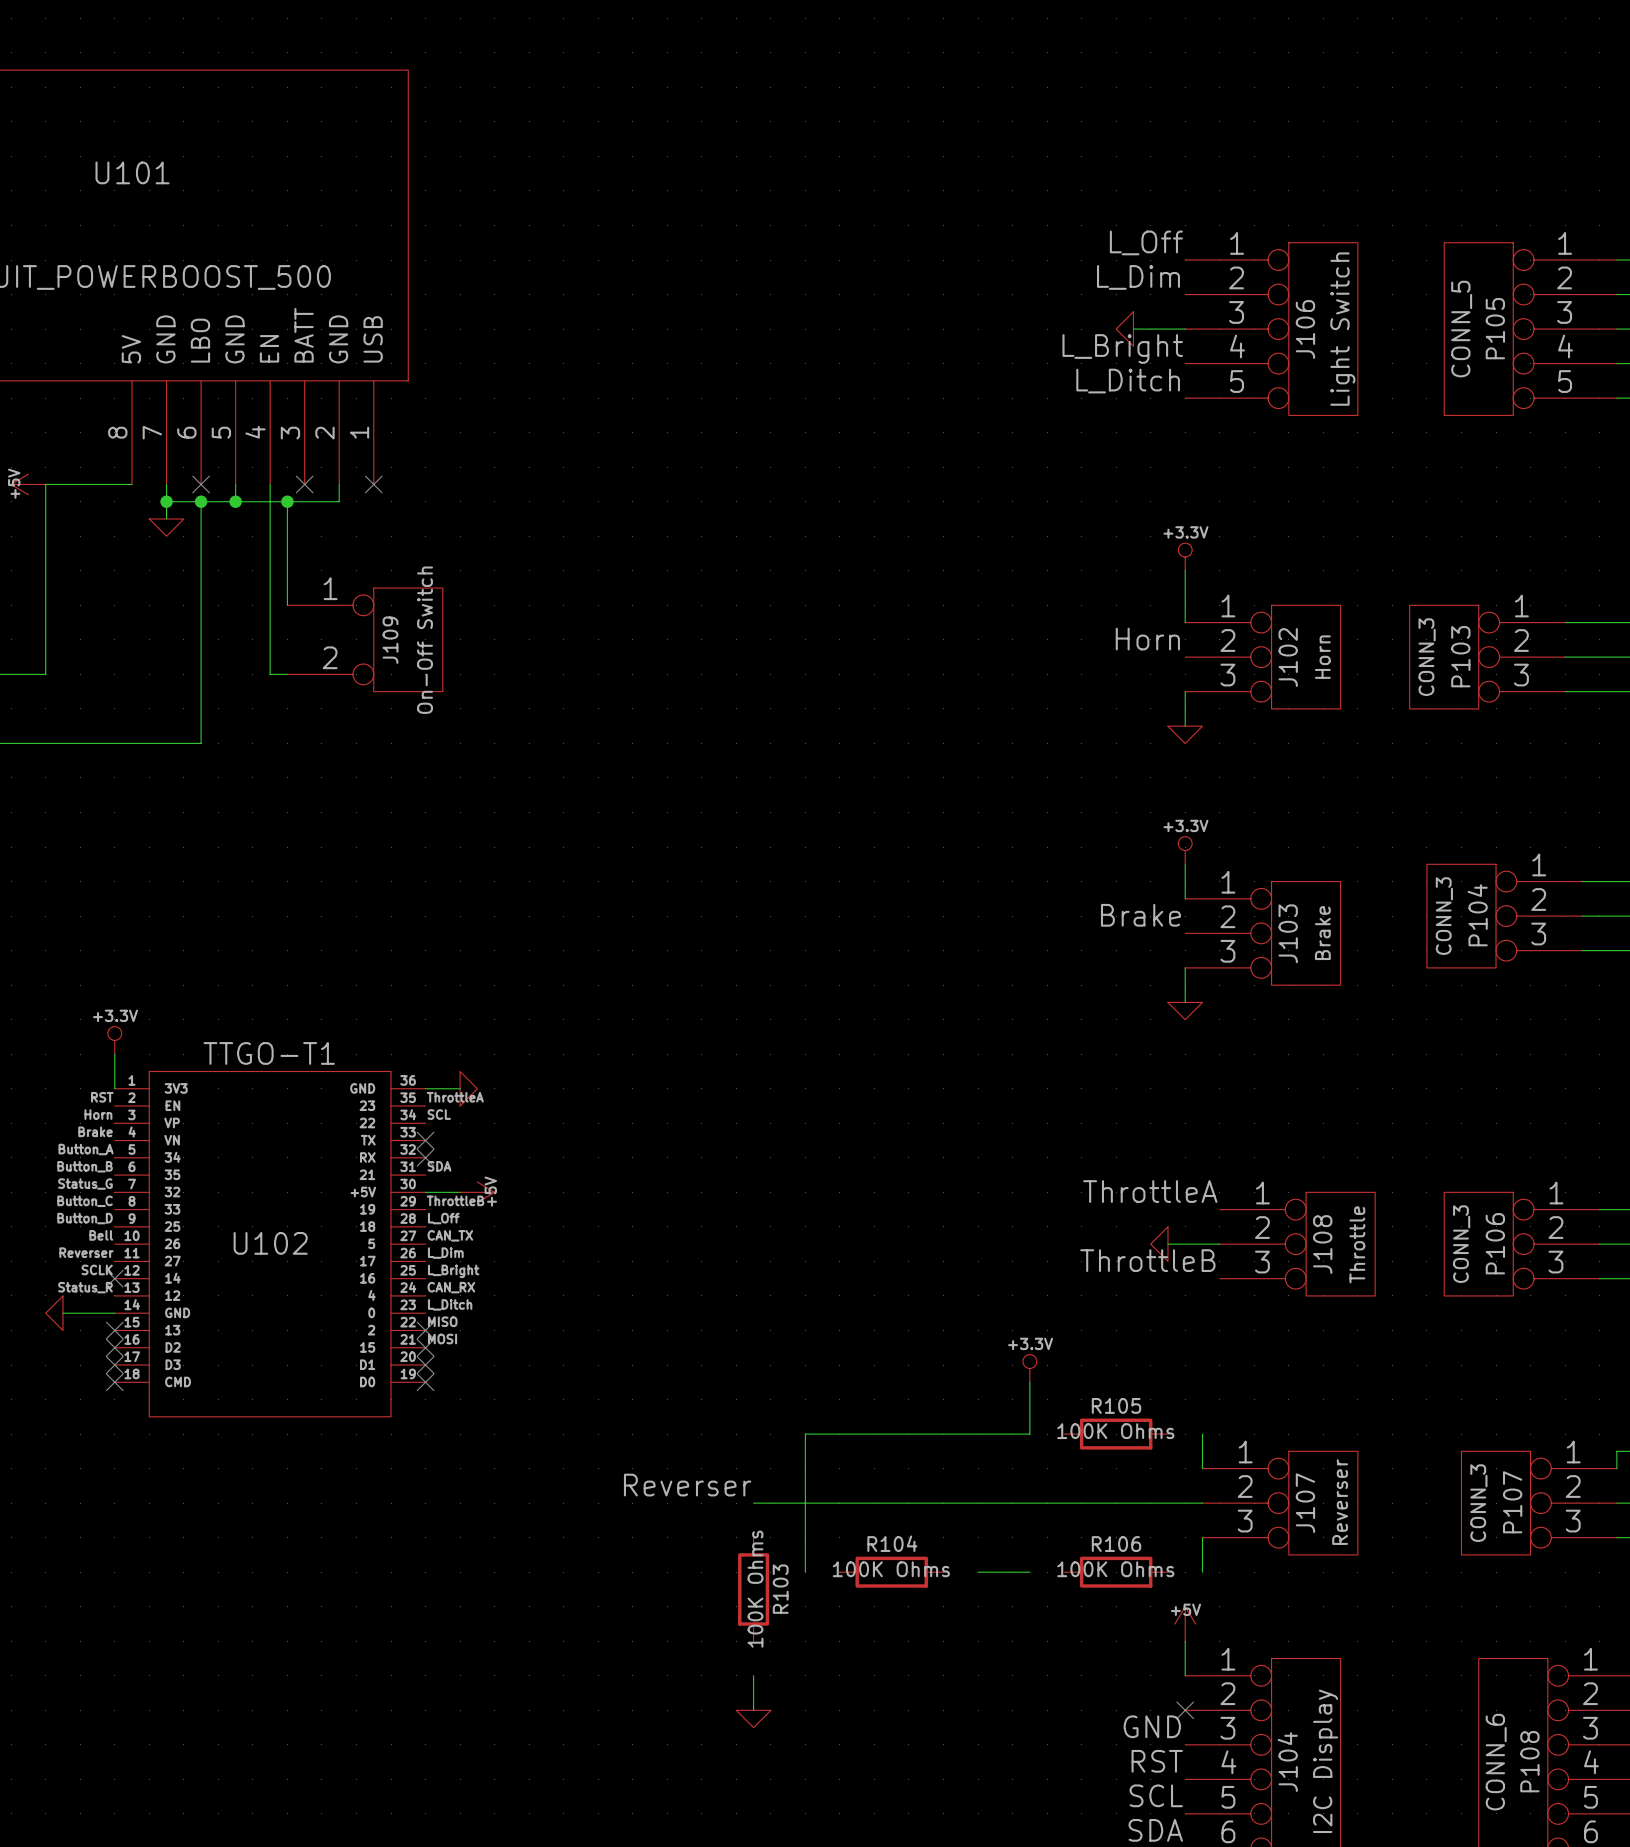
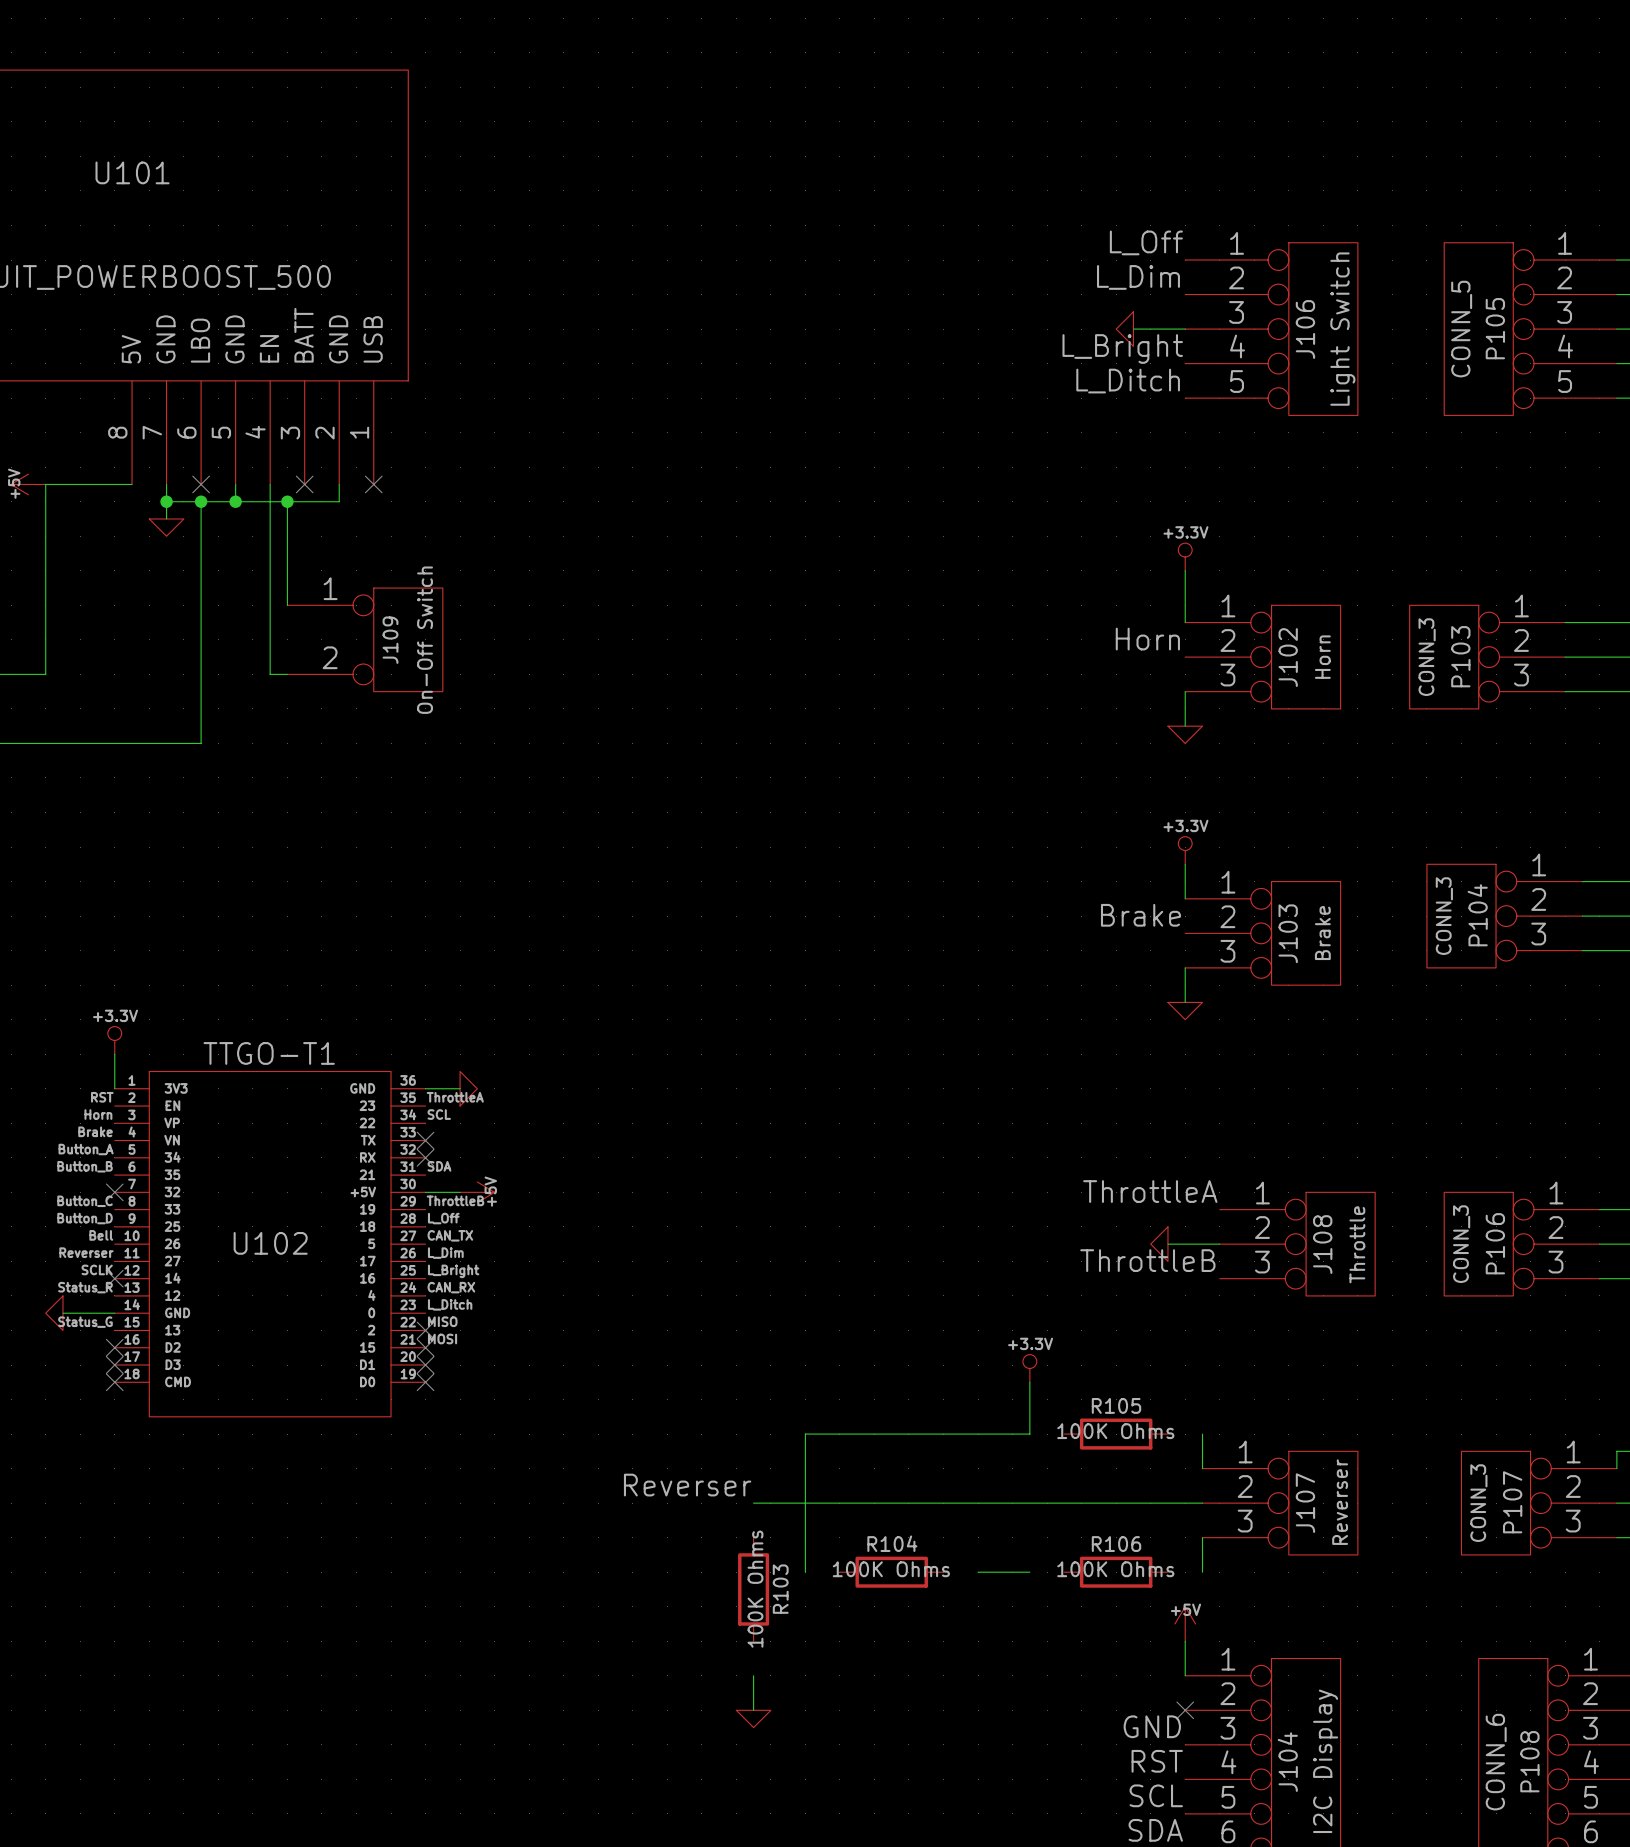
label position: Status_G (85, 1184) -> Status_G (85, 1322)
no-connect mark: none -> (114, 1192)
no-connect mark: (114, 1330) -> none

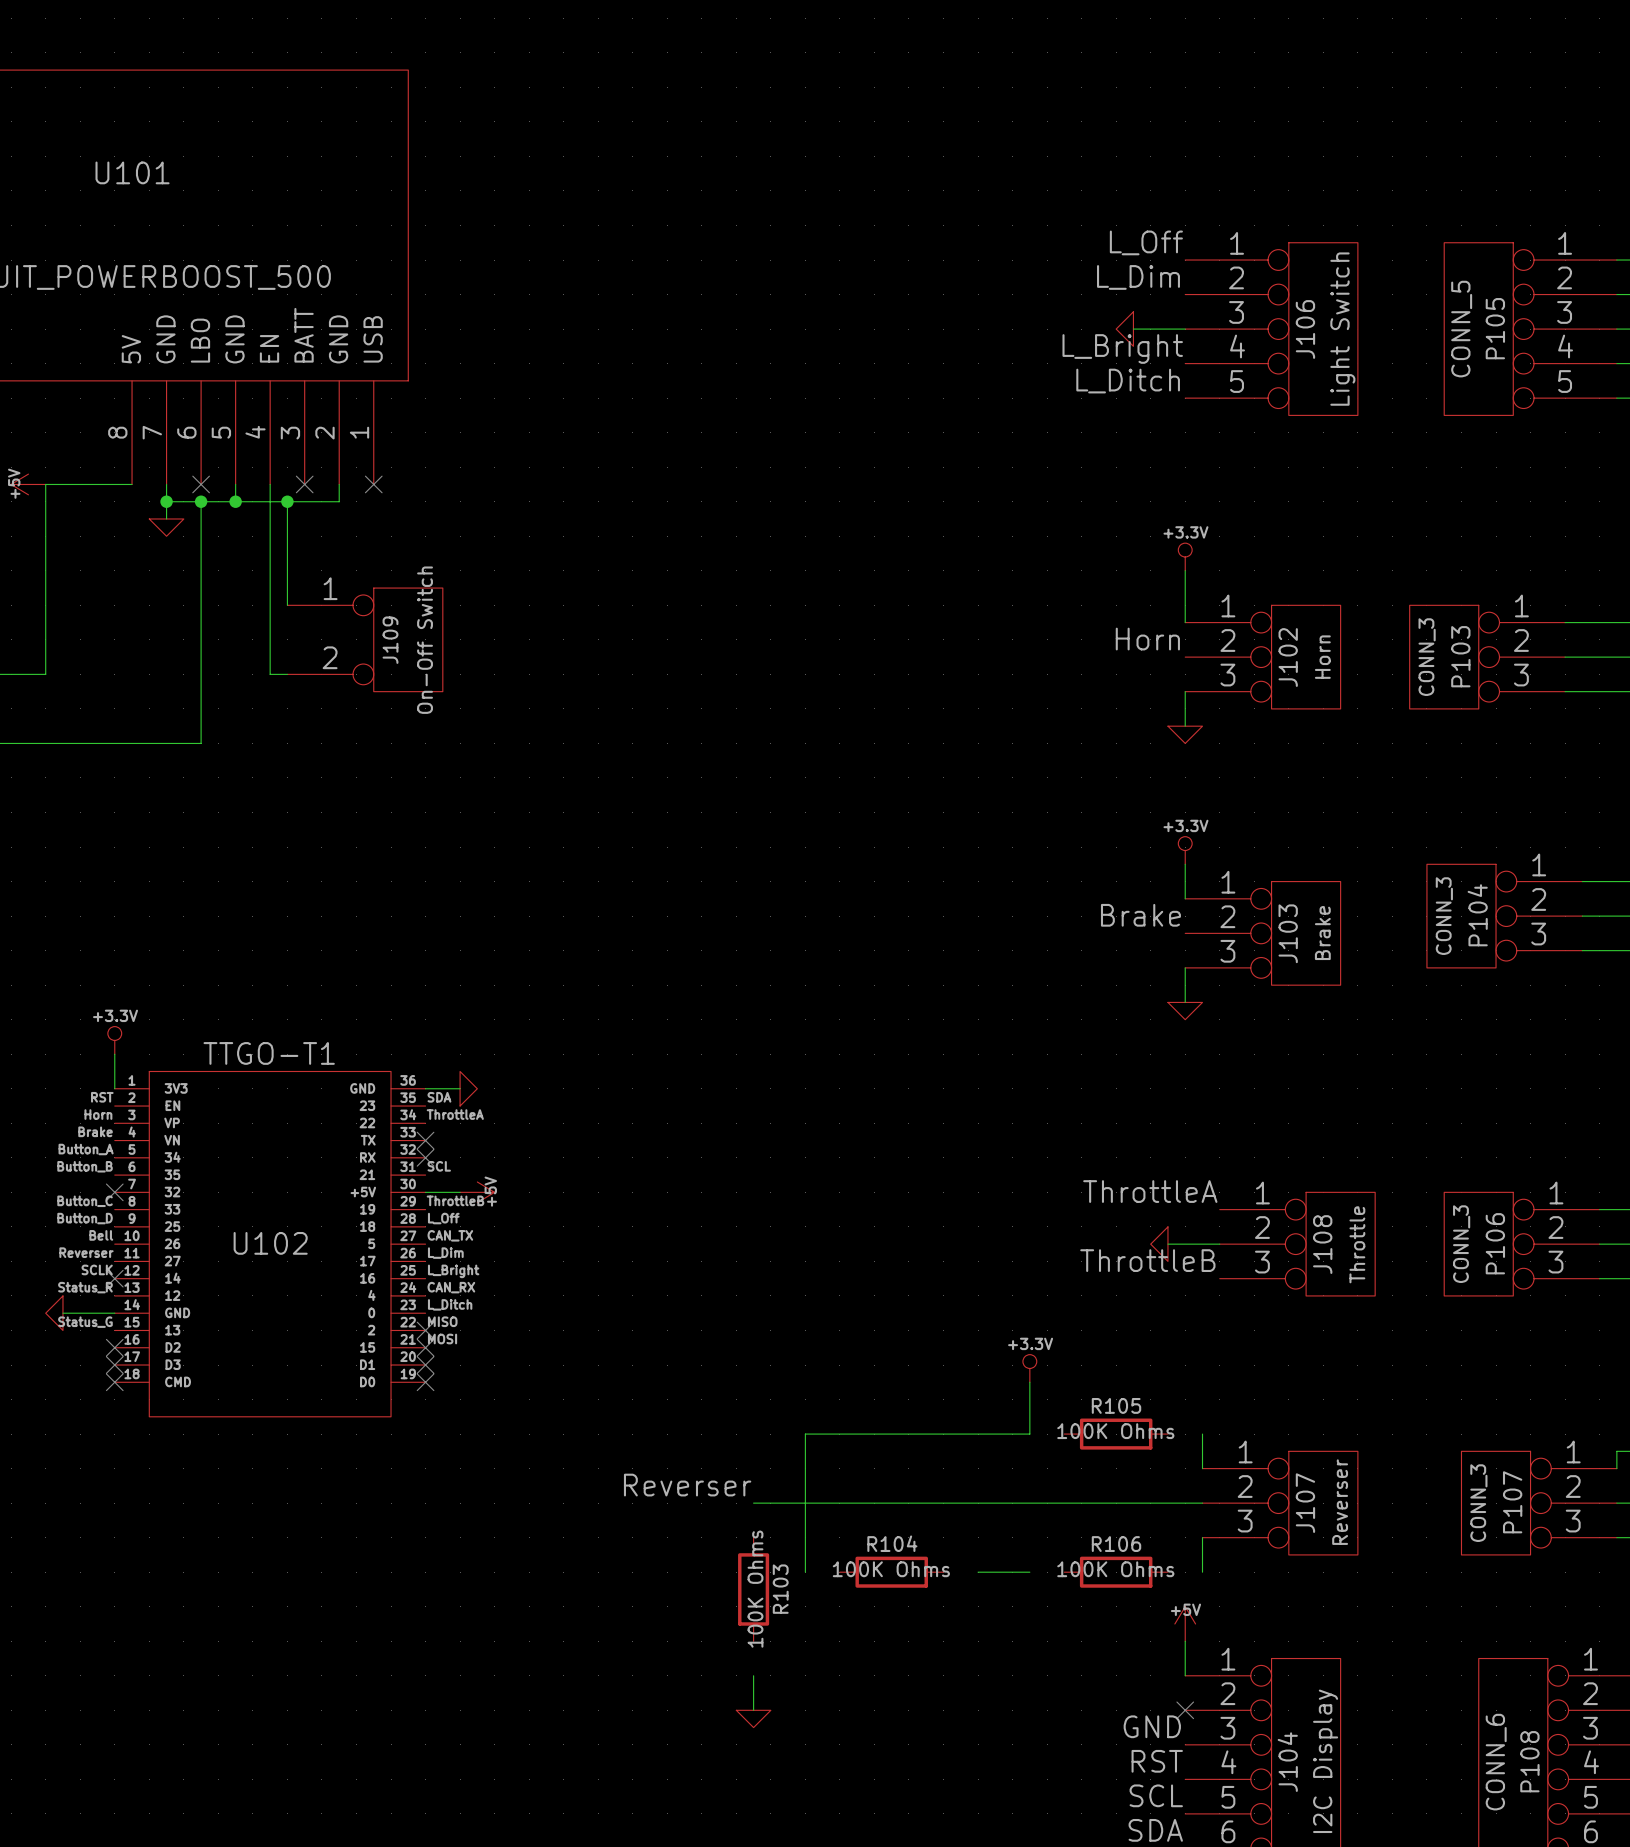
label: ThrottleA (455, 1097) -> SDA (439, 1097)
label: SCL (439, 1114) -> ThrottleA (455, 1114)
label: SDA (439, 1166) -> SCL (439, 1166)

